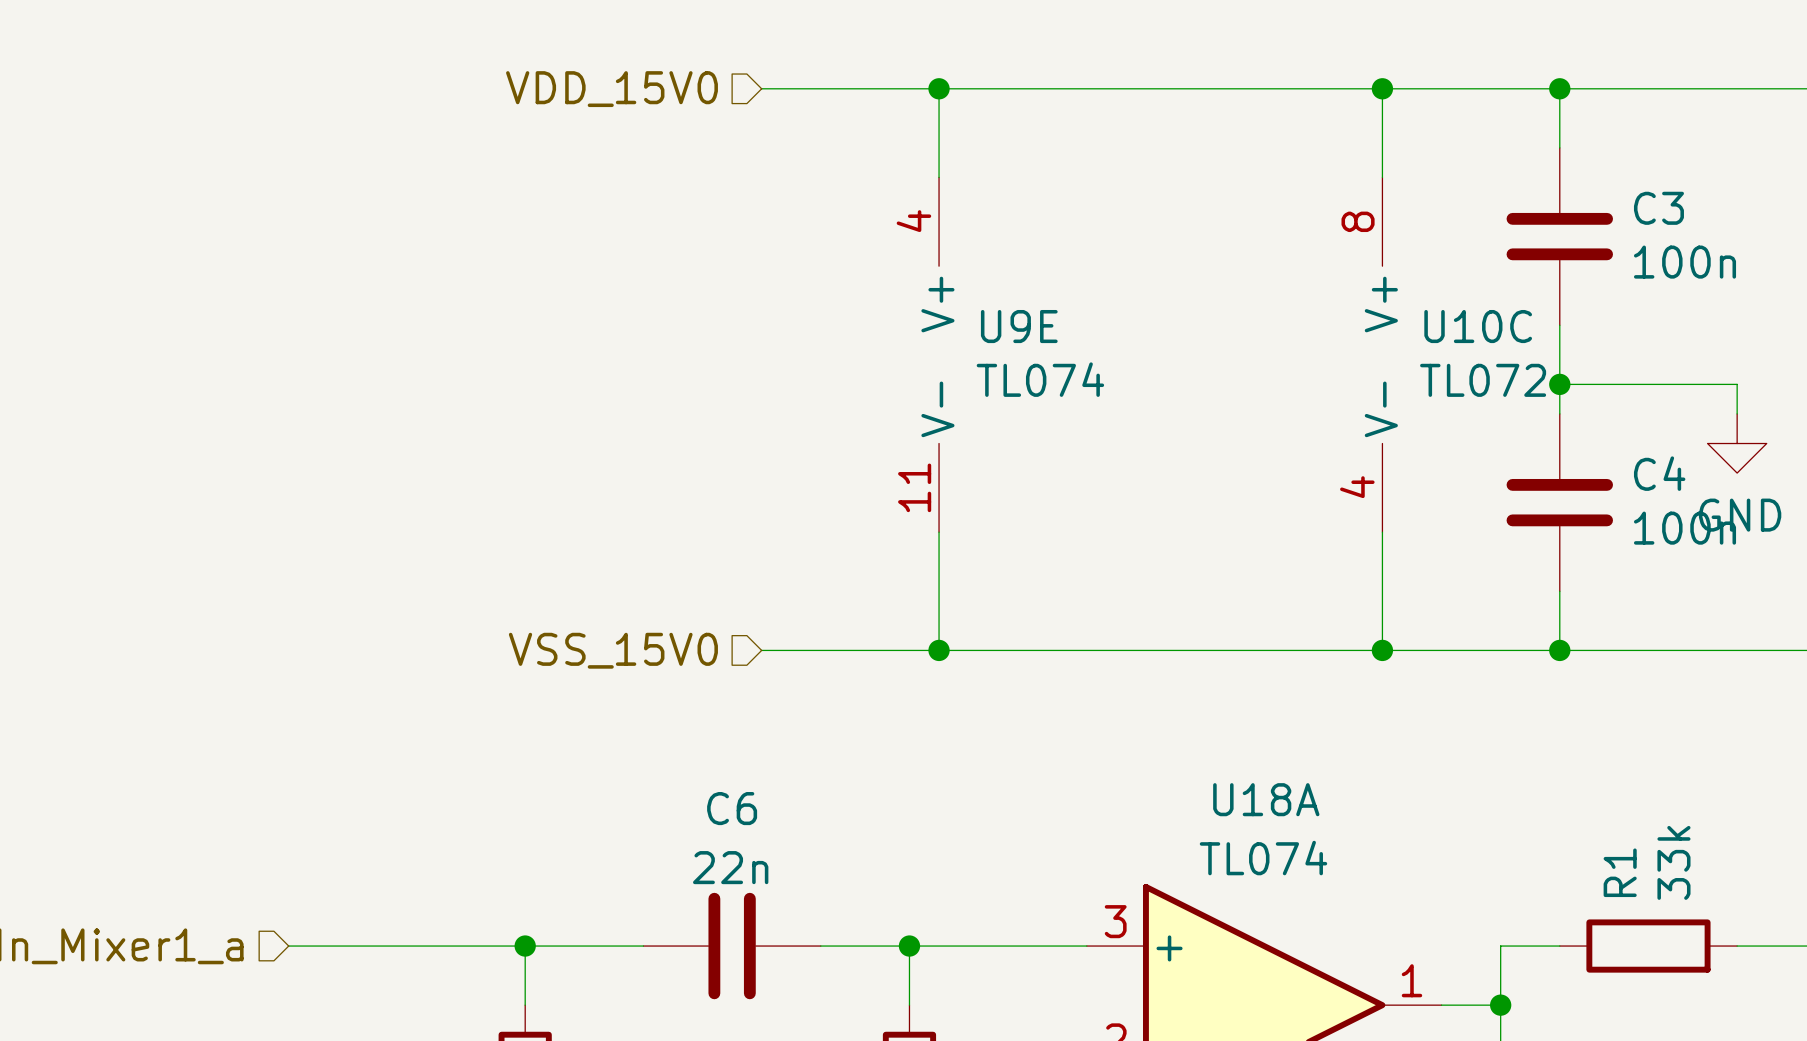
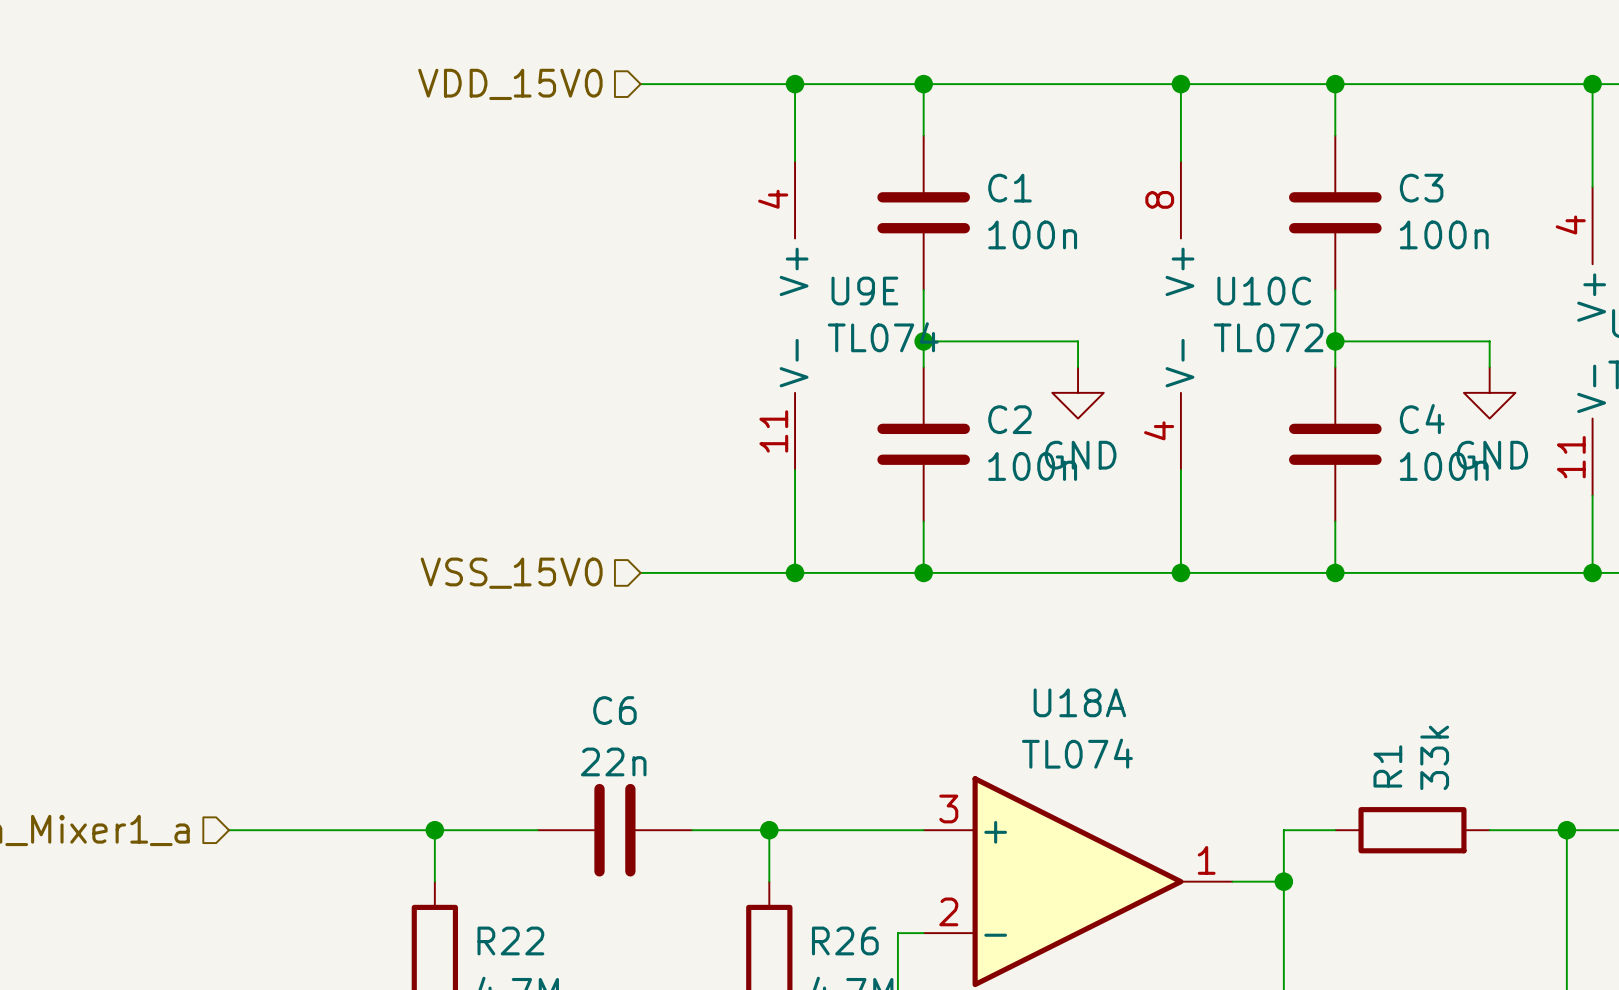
wire: none -> (923, 84) (923, 135)
junction: none -> (923, 84)
C1: none -> 100n (923, 212)
wire: none -> (923, 289) (923, 367)
wire: none -> (923, 341) (1078, 341) (1078, 367)
junction: none -> (923, 341)
power symbol: none -> GND (1078, 392)
C2: none -> 100n (923, 444)
wire: none -> (923, 521) (923, 572)
junction: none -> (923, 572)

